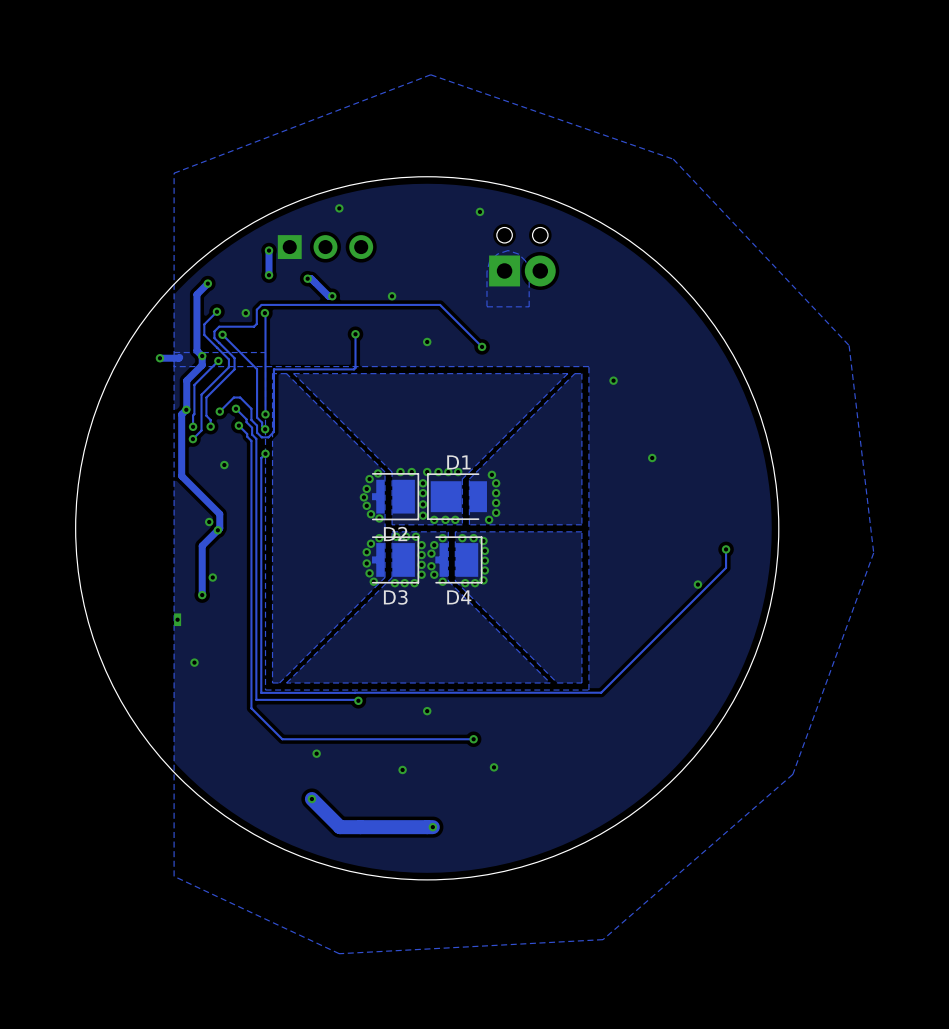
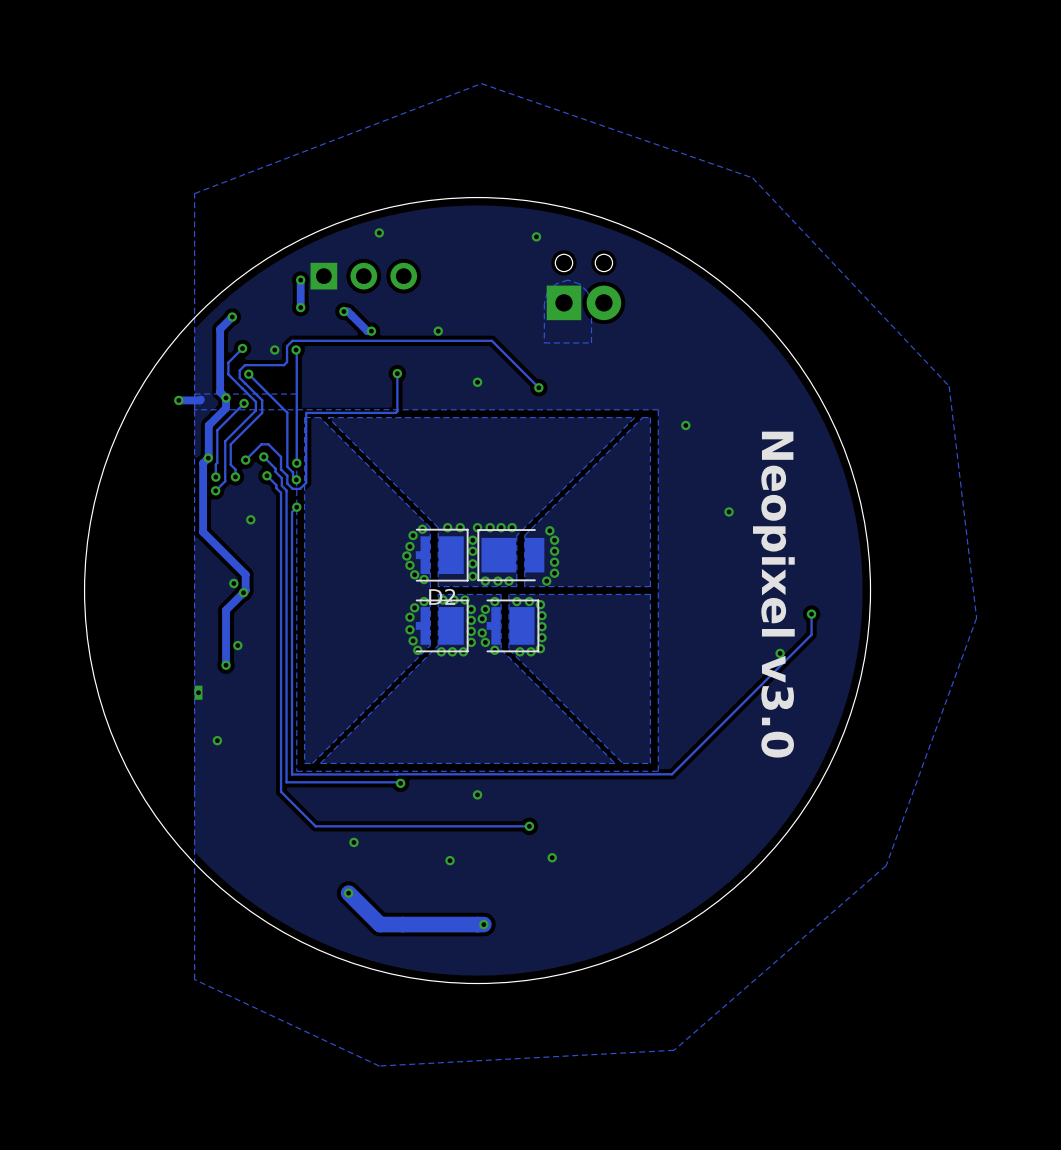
D1 name: D1 (458, 462) -> none
text: none -> Neopixel v3.0 (773, 594)
D3 name: D3 (395, 597) -> none
D4 name: D4 (459, 597) -> none

